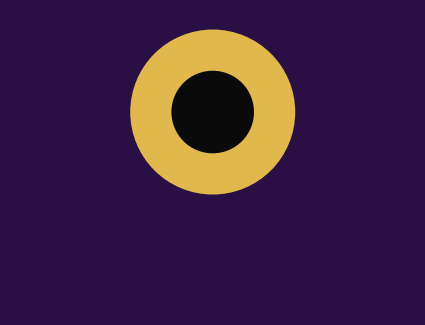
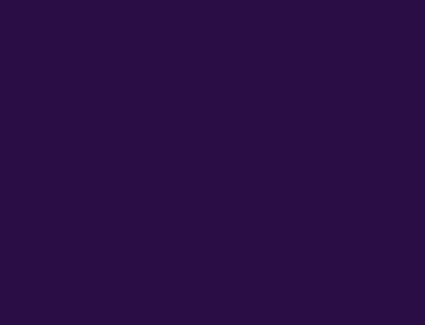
part: (212, 112) -> none

